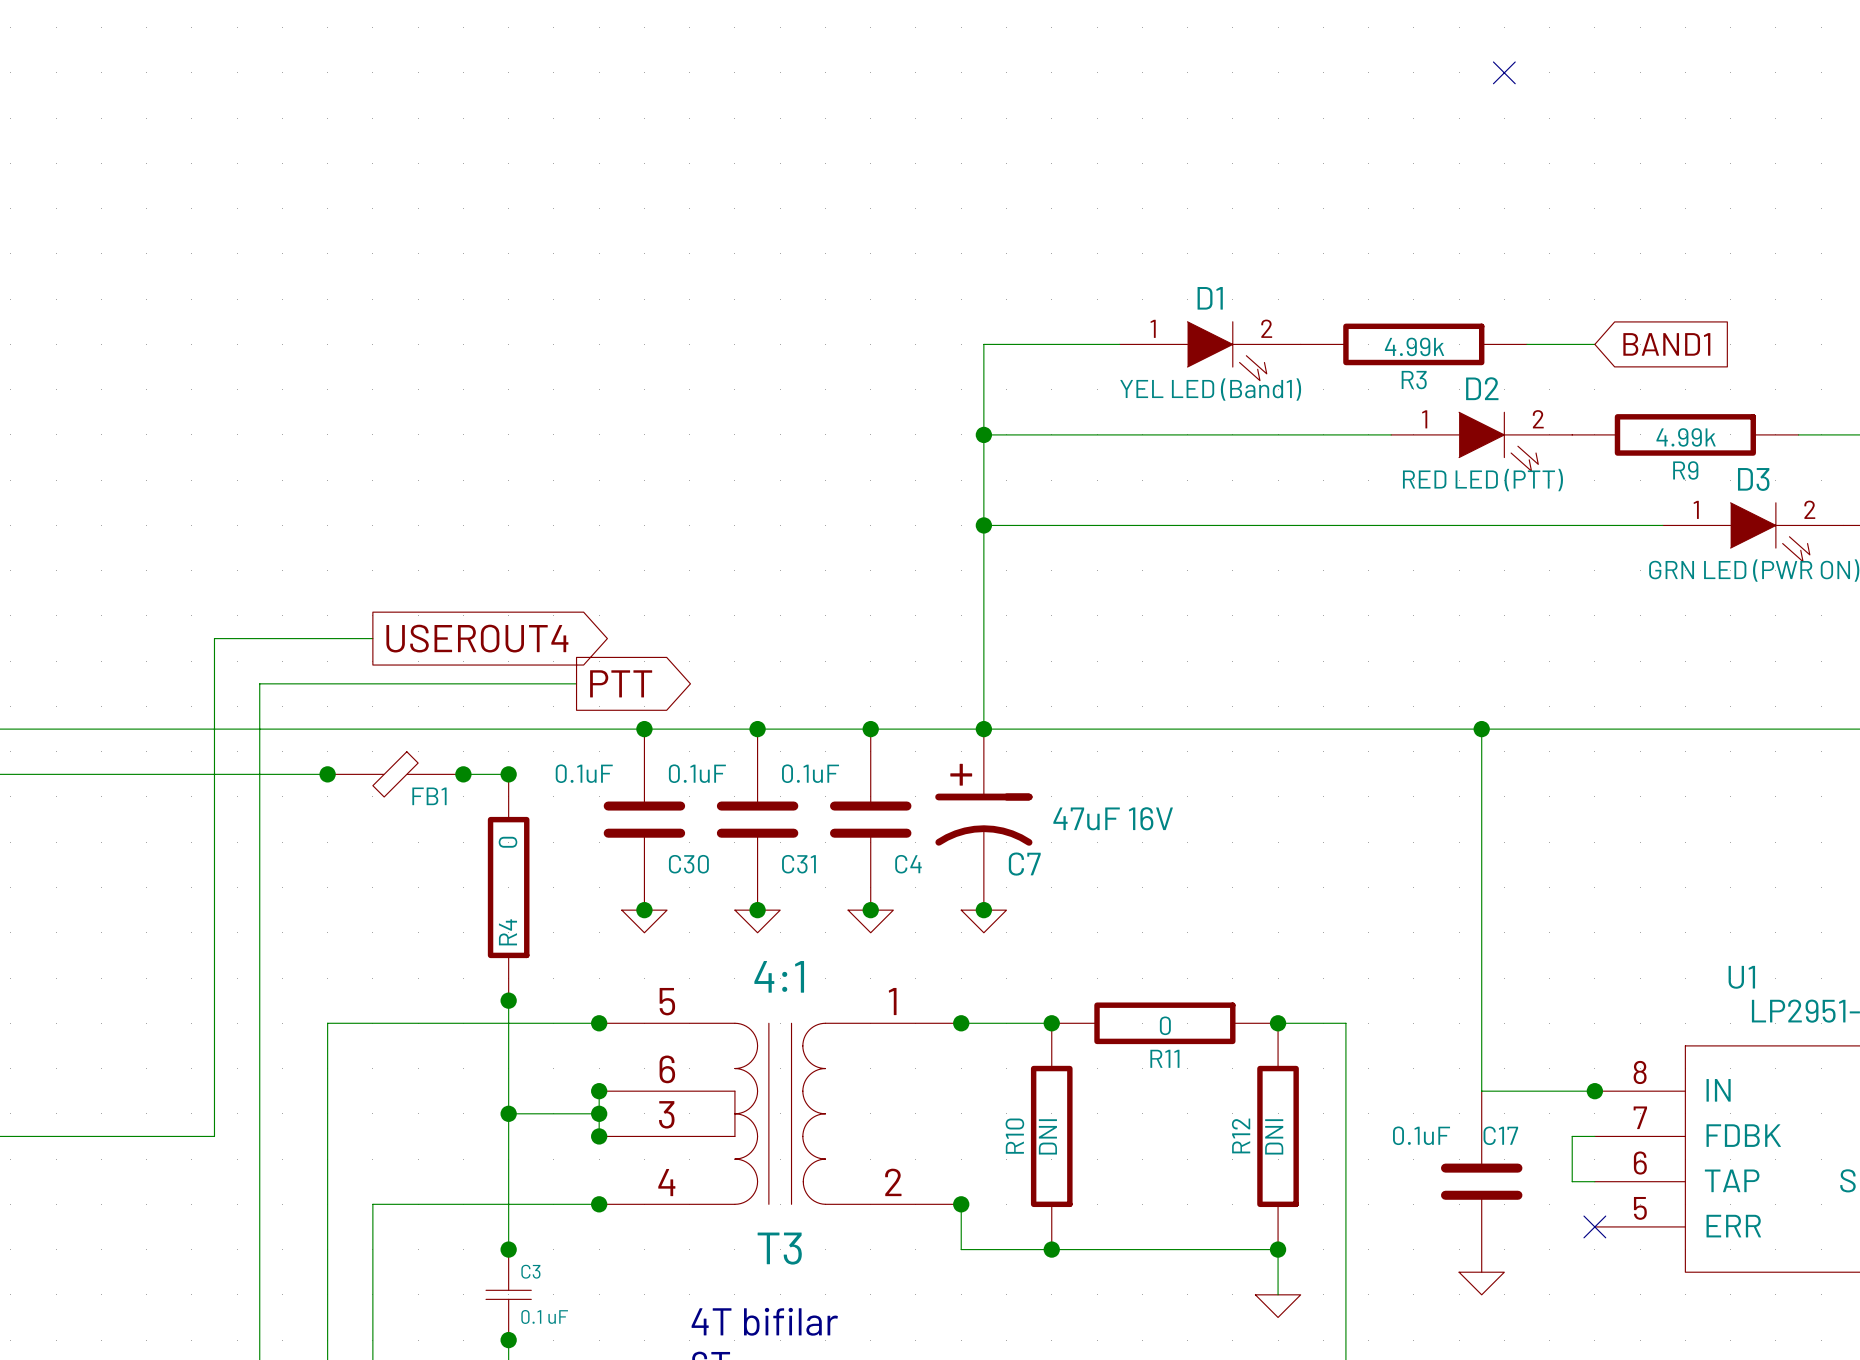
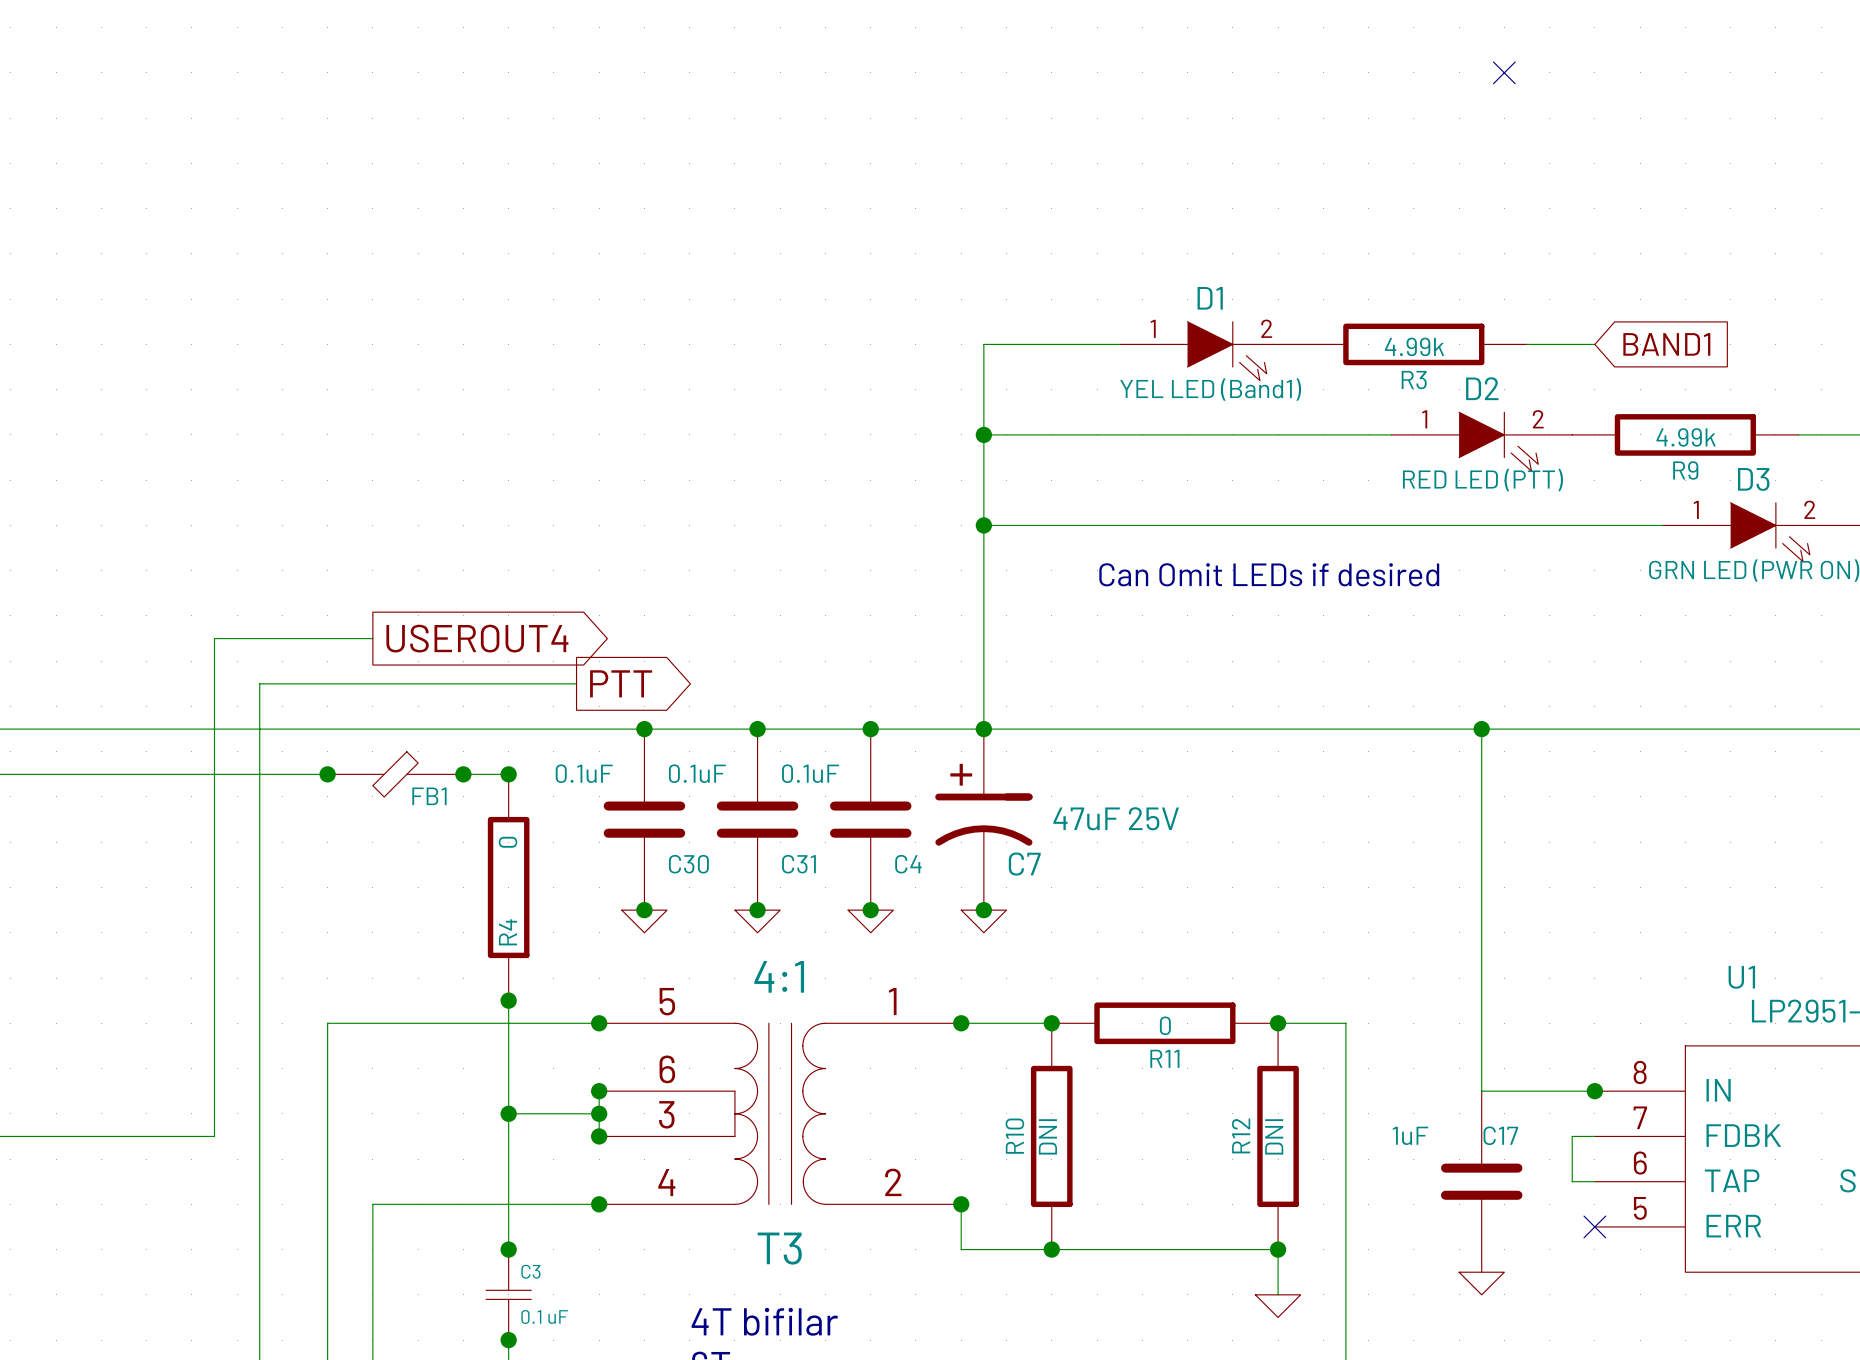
text: none -> Can Omit LEDs if desired (1269, 574)
C7 value: 47uF 16V (1113, 818) -> 47uF 25V (1116, 818)
C17 value: 0.1uF (1421, 1135) -> 1uF (1410, 1135)

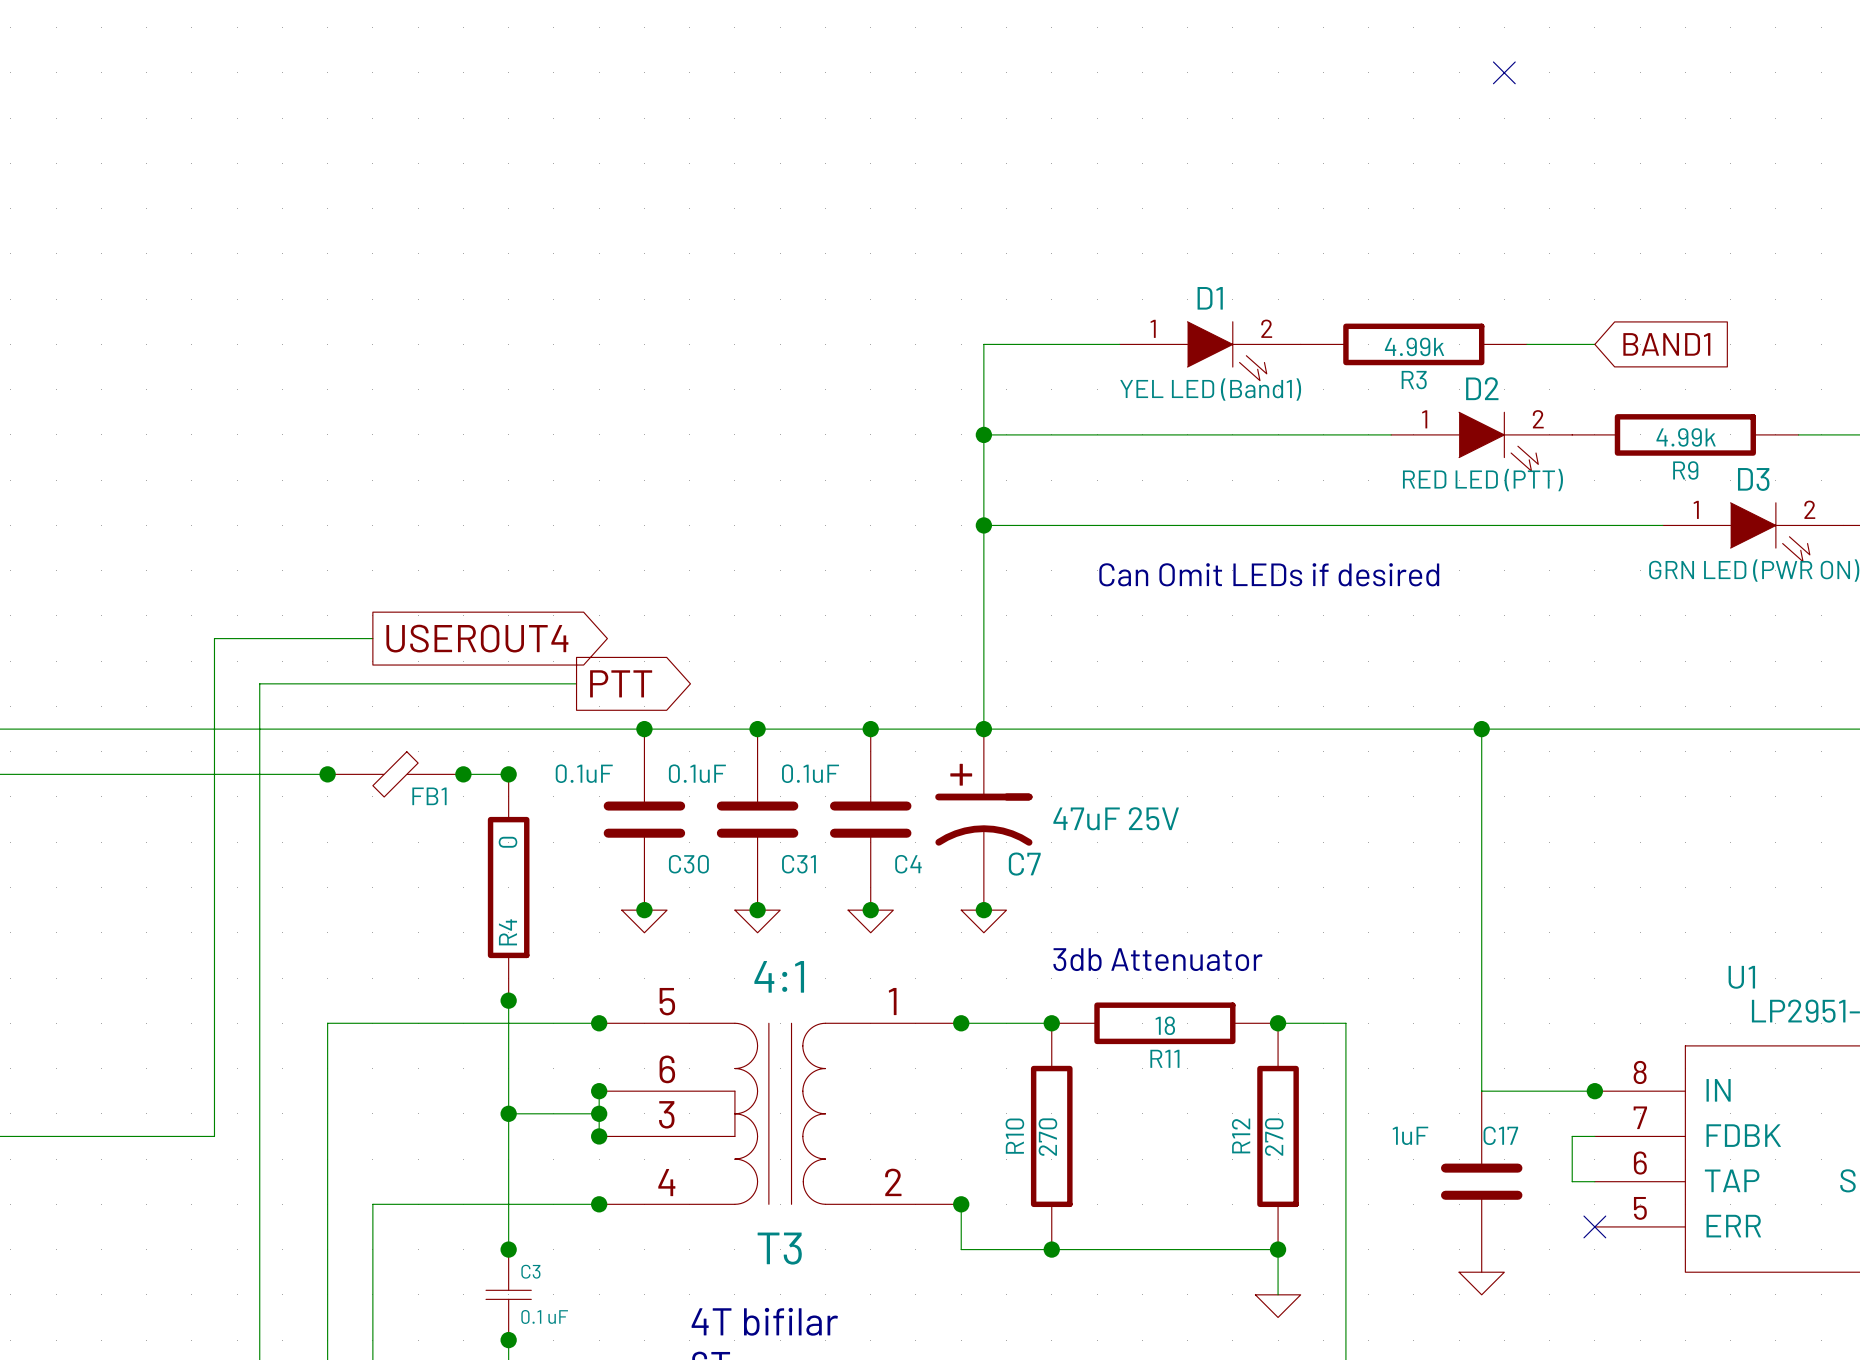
text: none -> 3db Attenuator (1157, 959)
R11 value: 0 (1165, 1025) -> 18 (1165, 1025)
R10 value: DNI (1047, 1136) -> 270 (1047, 1137)
R12 value: DNI (1274, 1136) -> 270 (1274, 1137)

